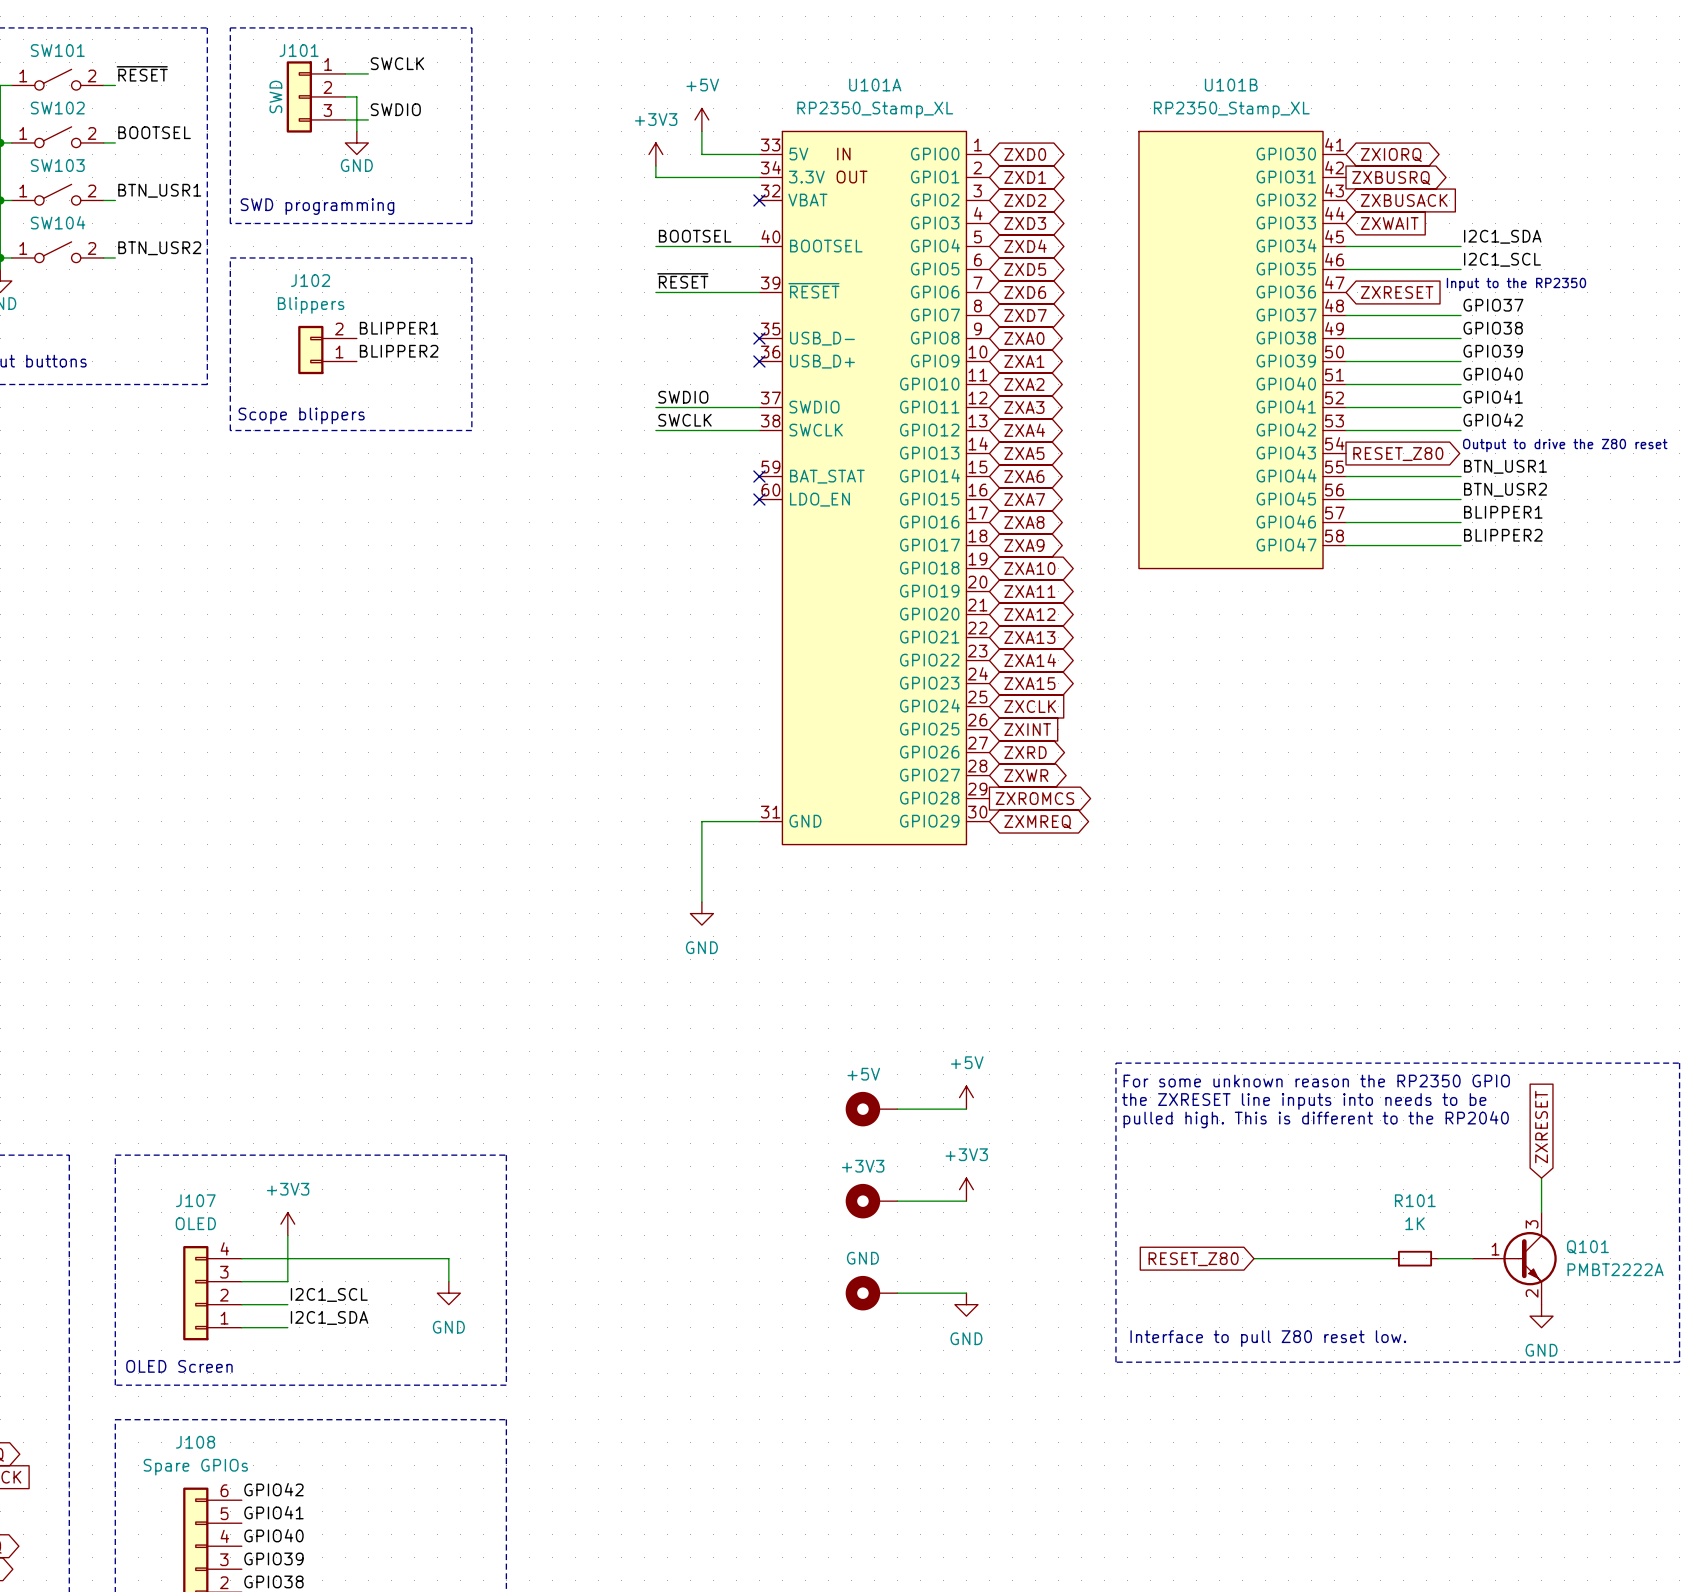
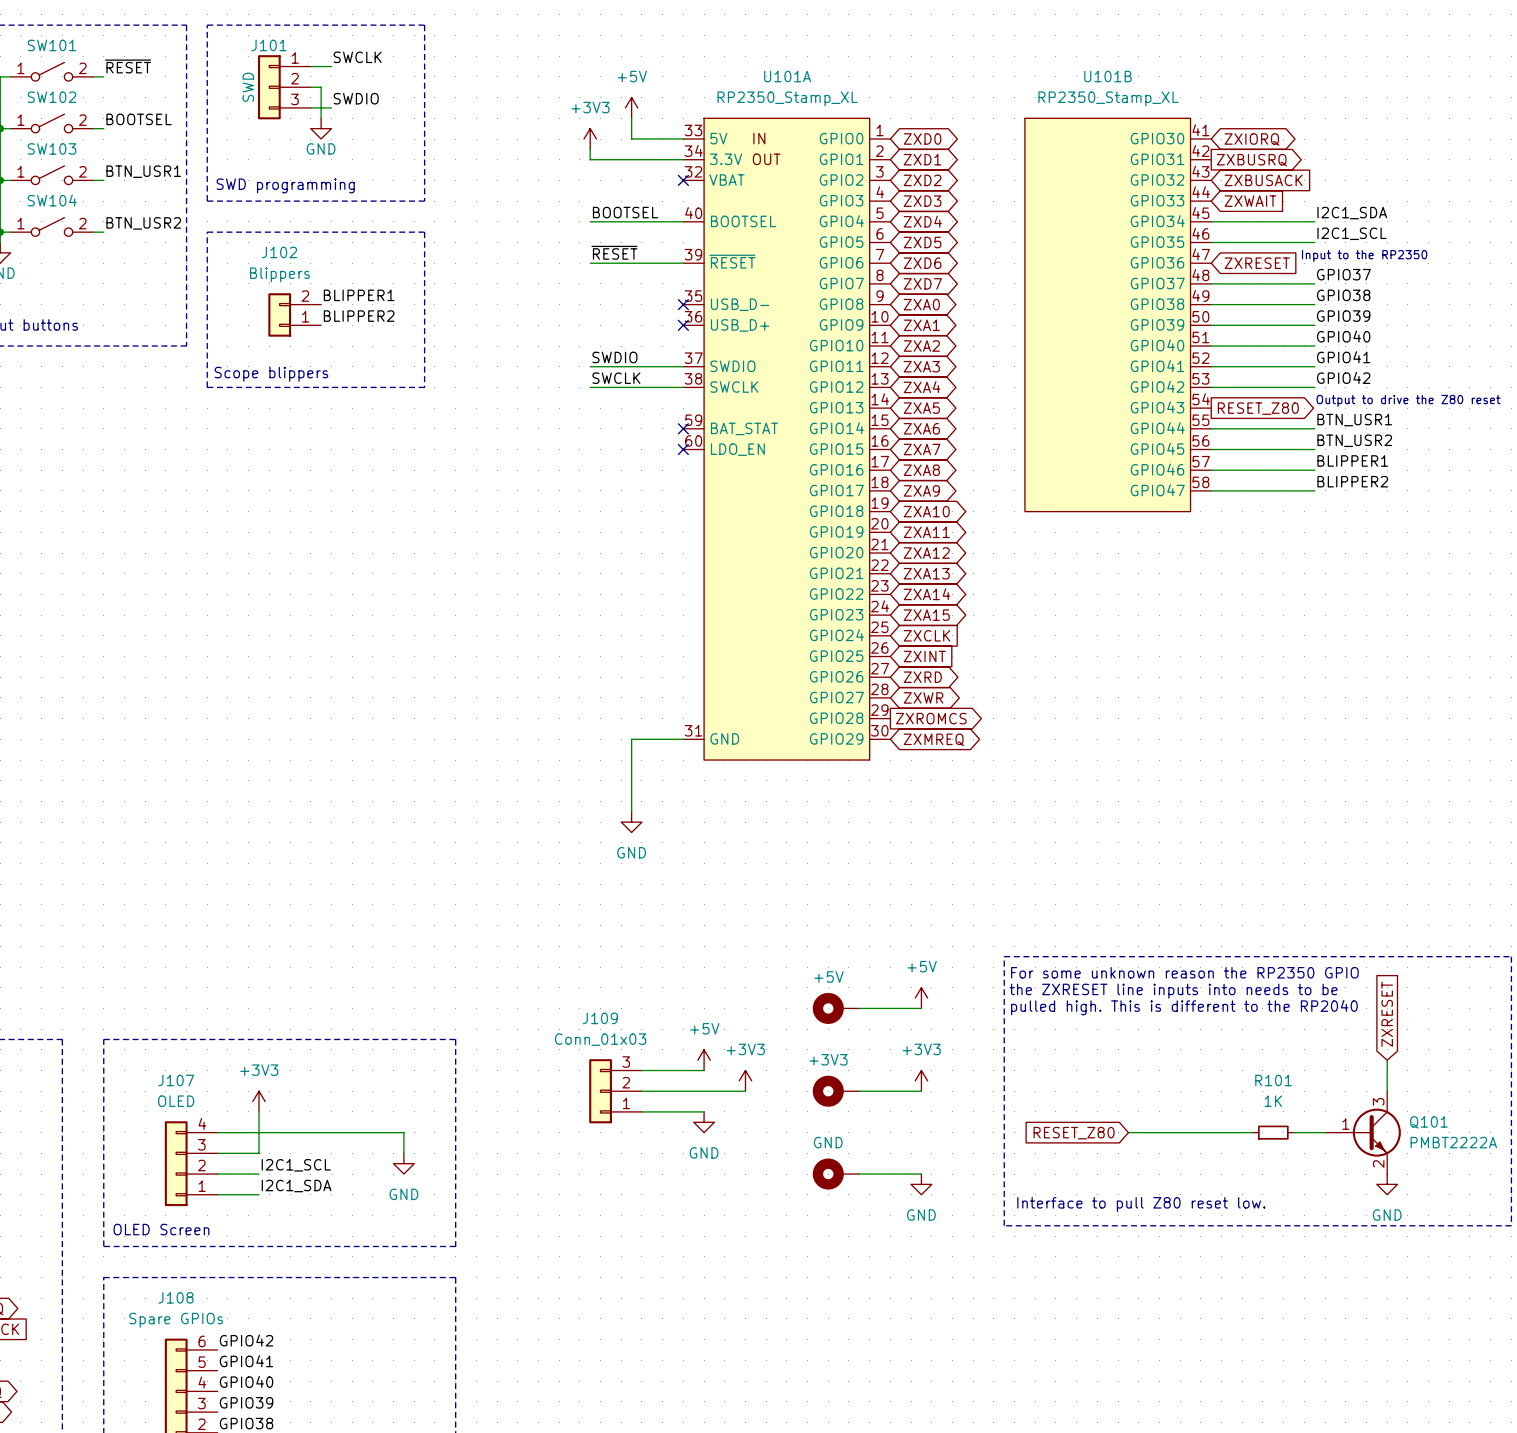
power symbol position: +5V (966, 1097) -> +5V (921, 998)
part position: (871, 1109) -> (836, 1008)
wire: (897, 1109) (966, 1109) -> (859, 1008) (921, 1008)
power symbol: none -> +5V (704, 1060)
wire: none -> (641, 1070) (704, 1070)
power symbol position: +3V3 (966, 1189) -> +3V3 (921, 1080)
power symbol: none -> +3V3 (745, 1080)
part position: (871, 1201) -> (836, 1091)
wire: (897, 1201) (966, 1201) -> (859, 1091) (921, 1091)
J109: none -> Conn_01x03 (615, 1091)
wire: none -> (641, 1091) (745, 1091)
wire: none -> (641, 1111) (704, 1111)
power symbol: none -> GND (704, 1122)
part position: (871, 1293) -> (836, 1174)
wire: (897, 1293) (966, 1293) -> (859, 1174) (921, 1174)
power symbol position: GND (966, 1304) -> GND (921, 1184)

